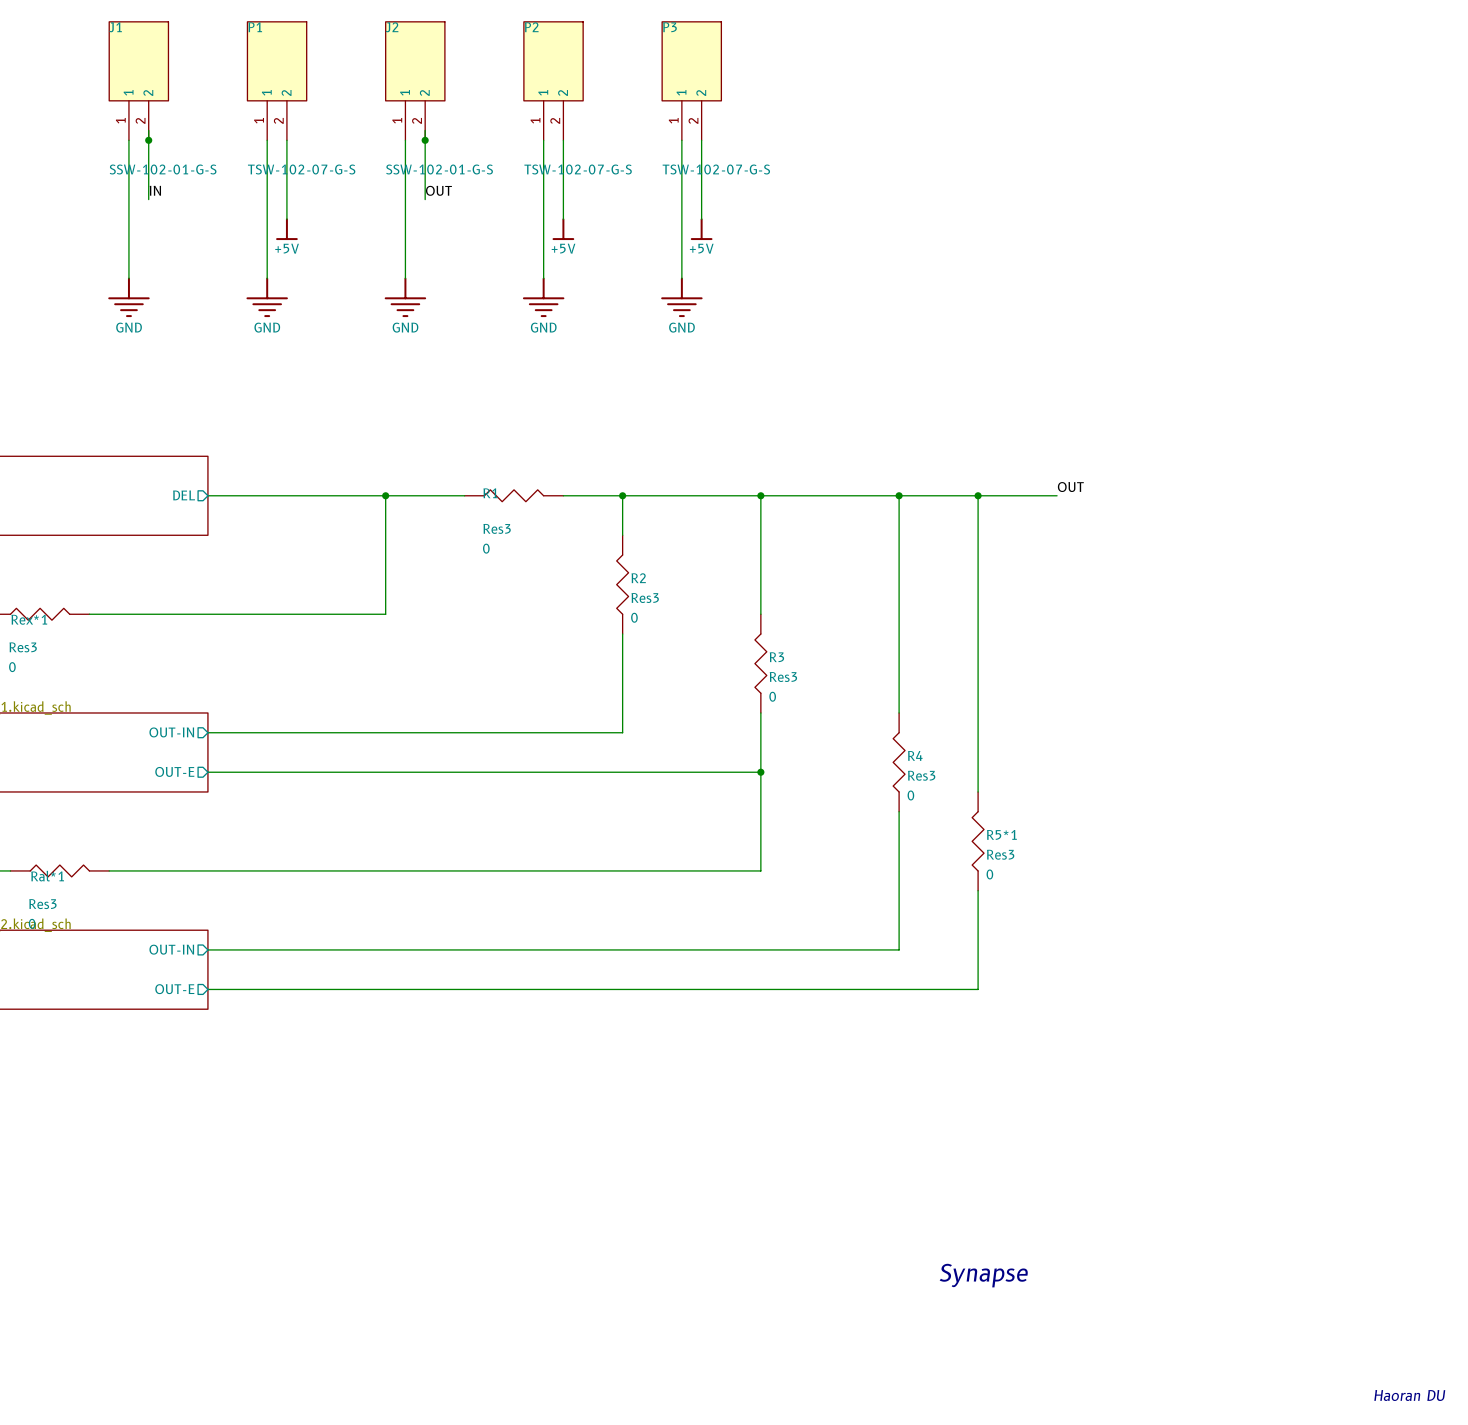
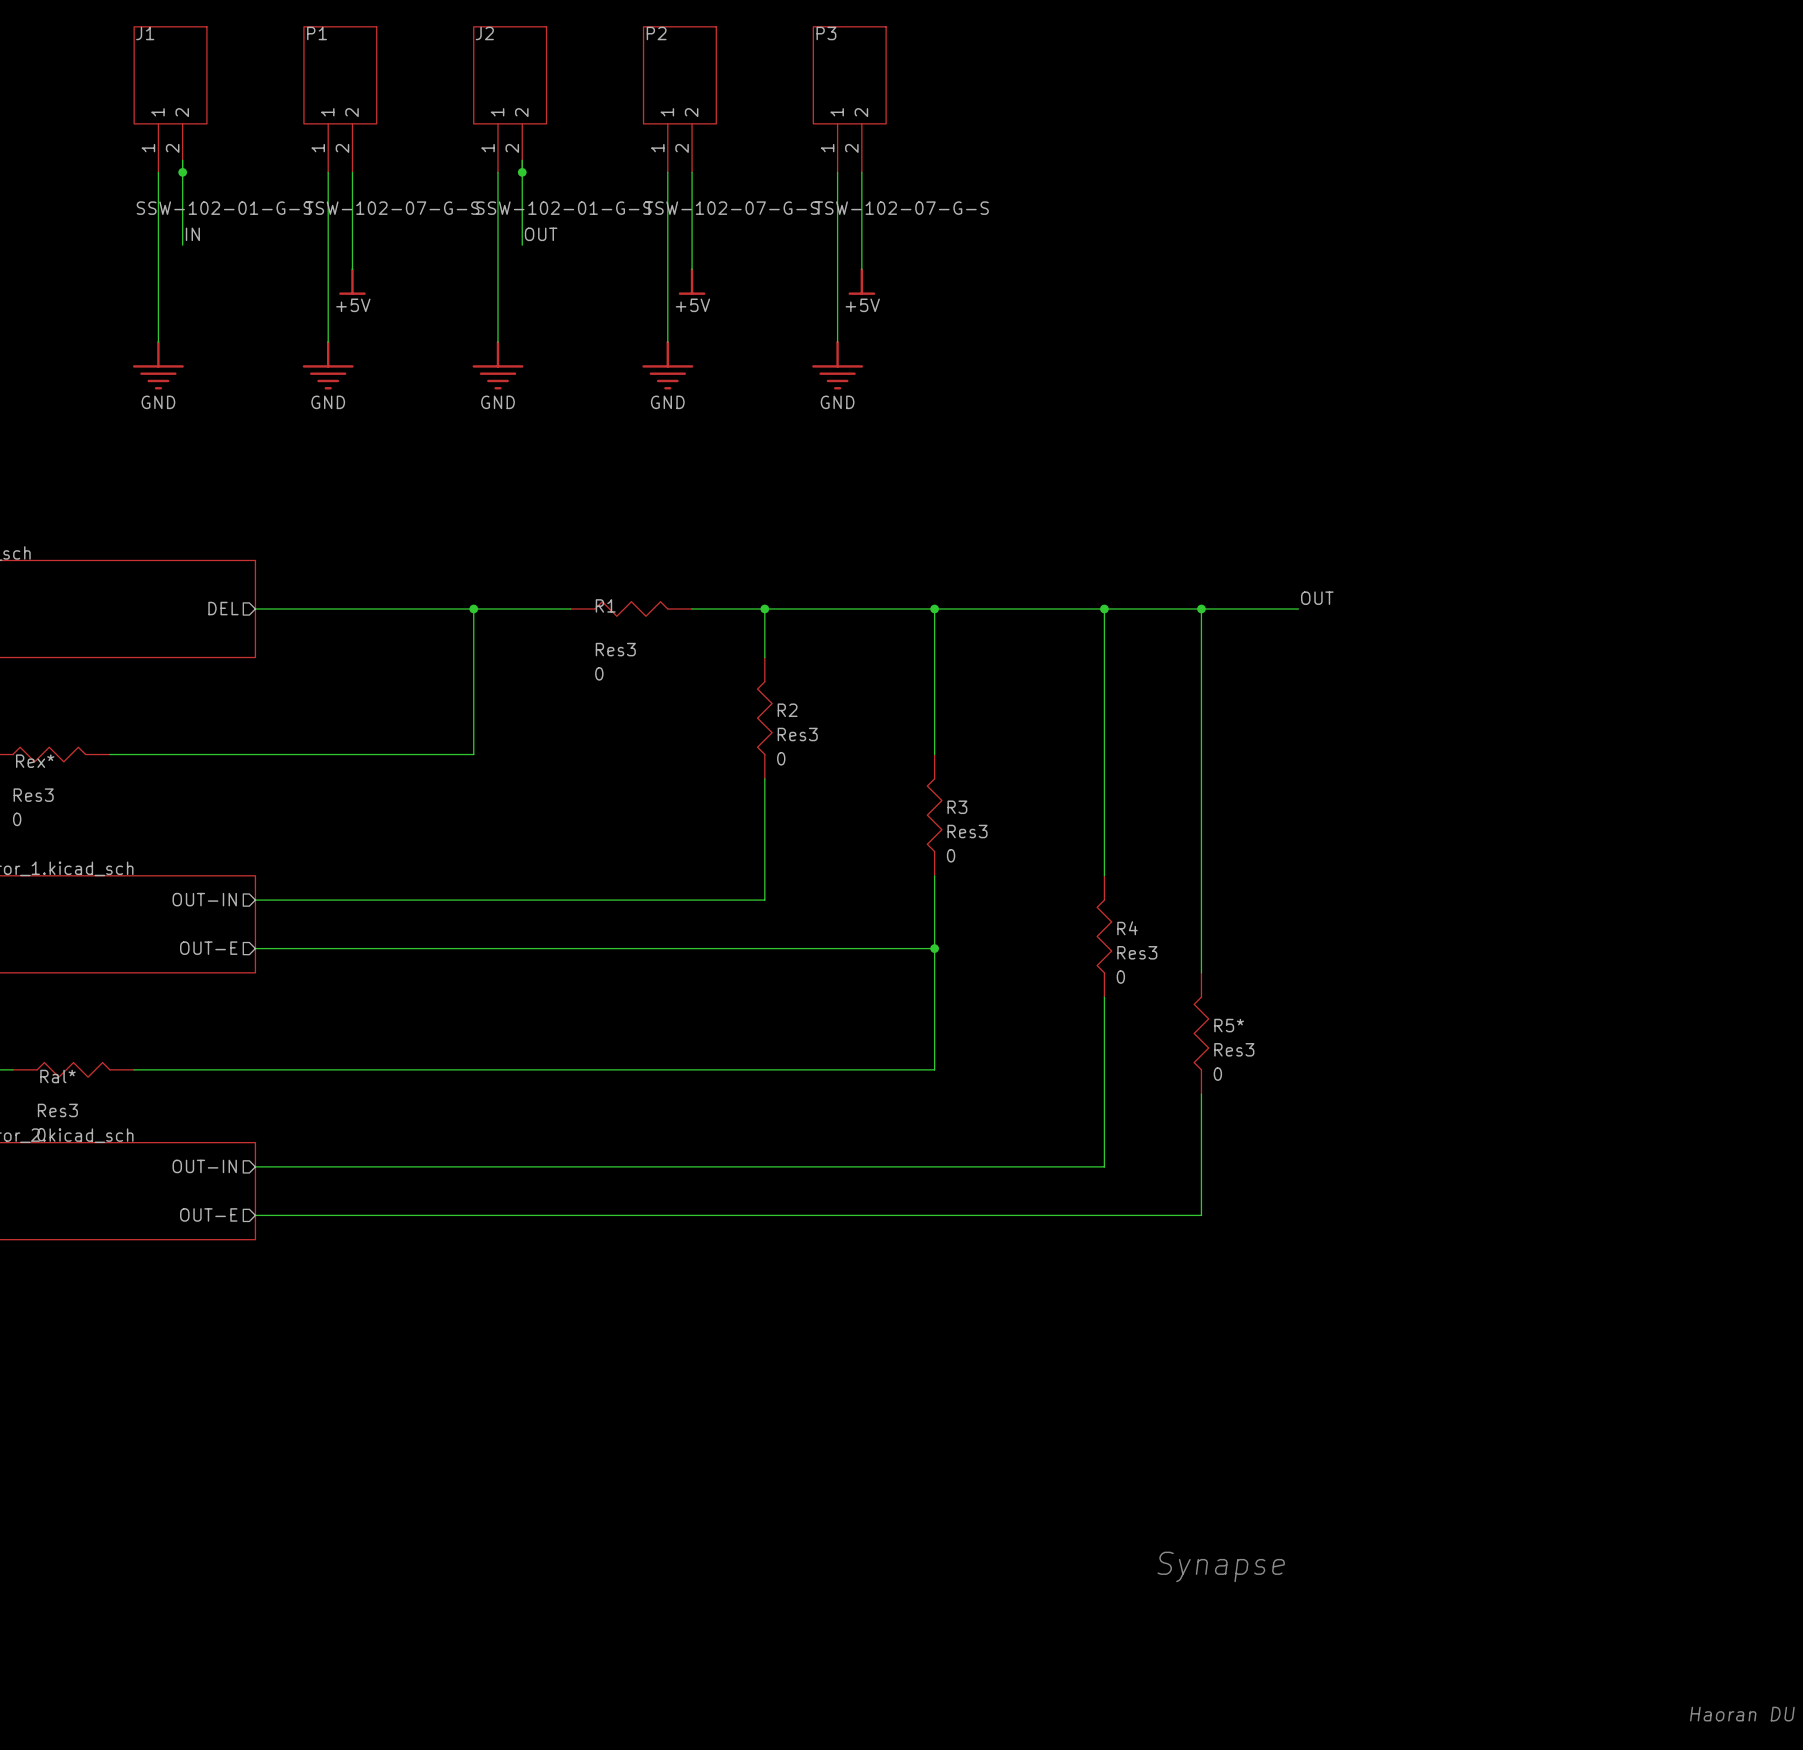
Rex*1 name: Rex*1 (29, 619) -> Rex* (35, 761)
R5*1 name: R5*1 (1001, 834) -> R5* (1229, 1025)
Ral*1 name: Ral*1 (47, 876) -> Ral* (58, 1076)

